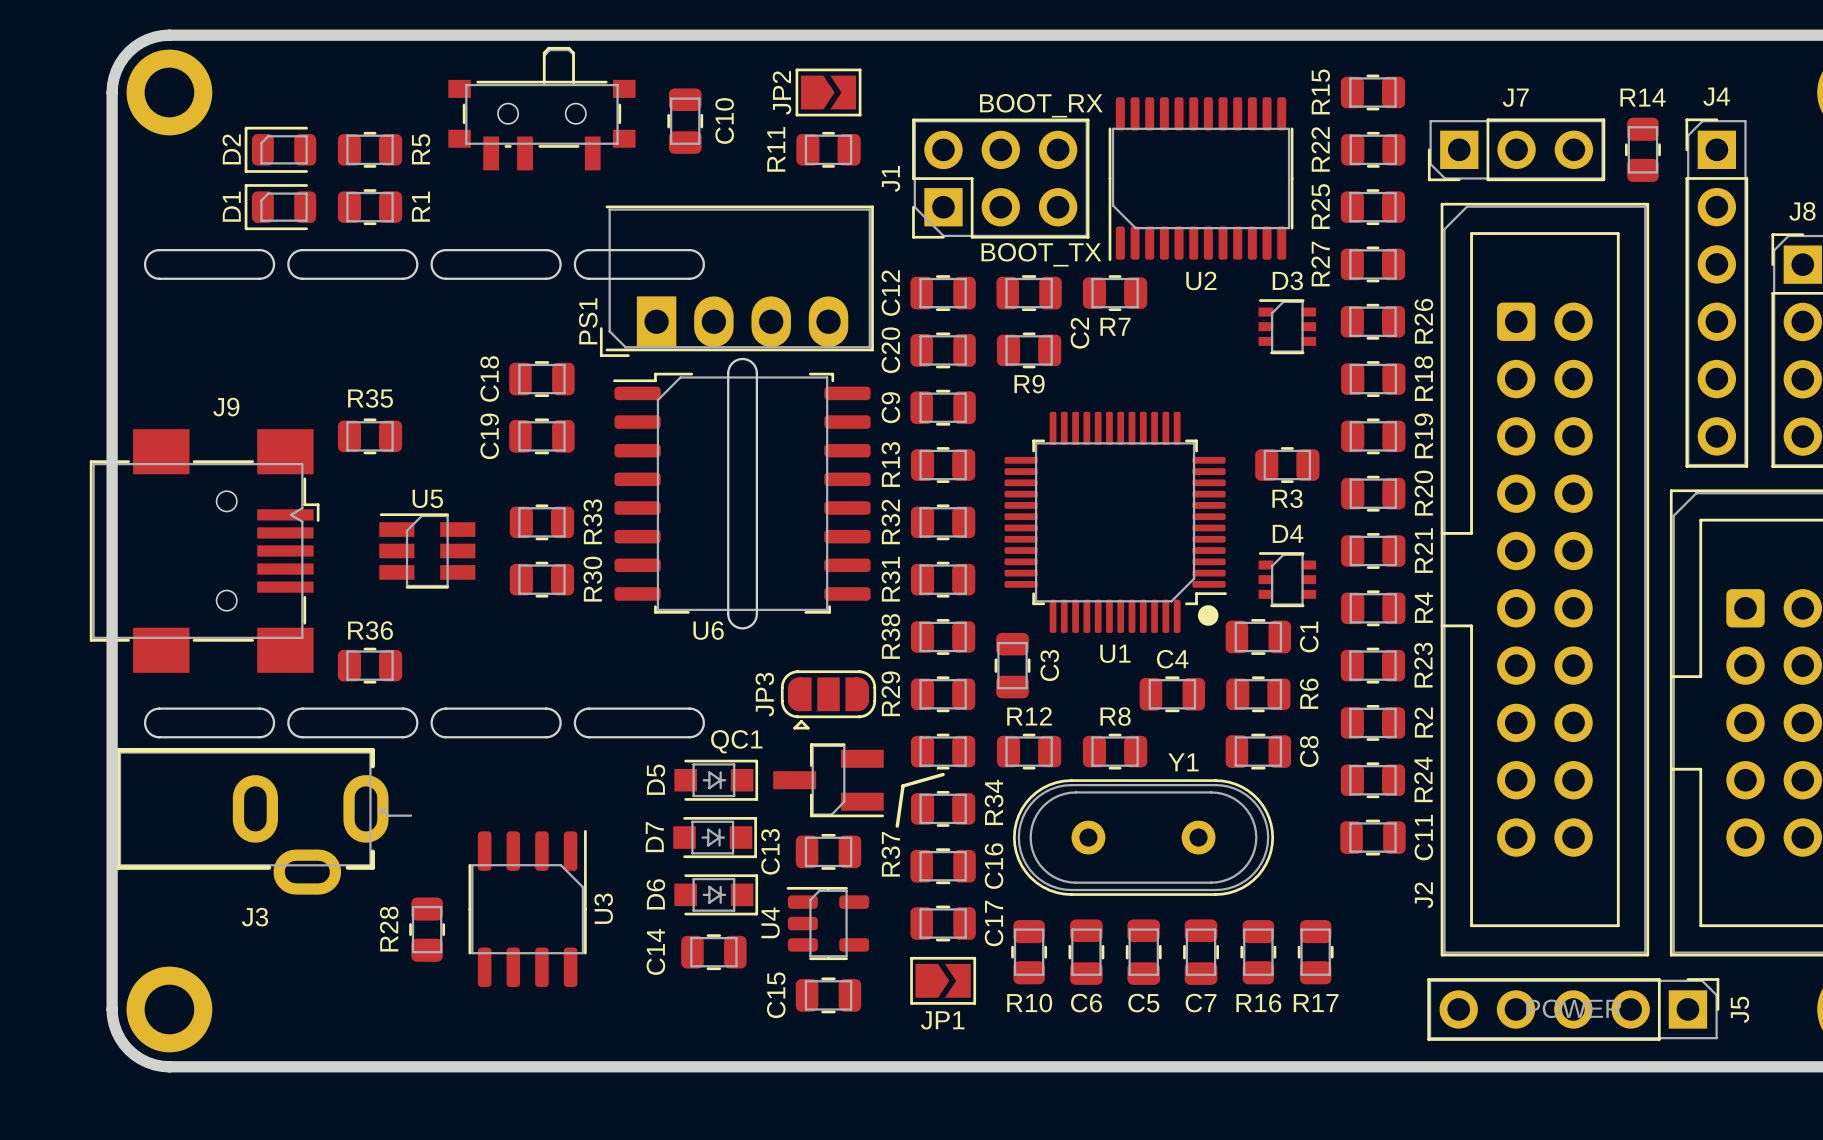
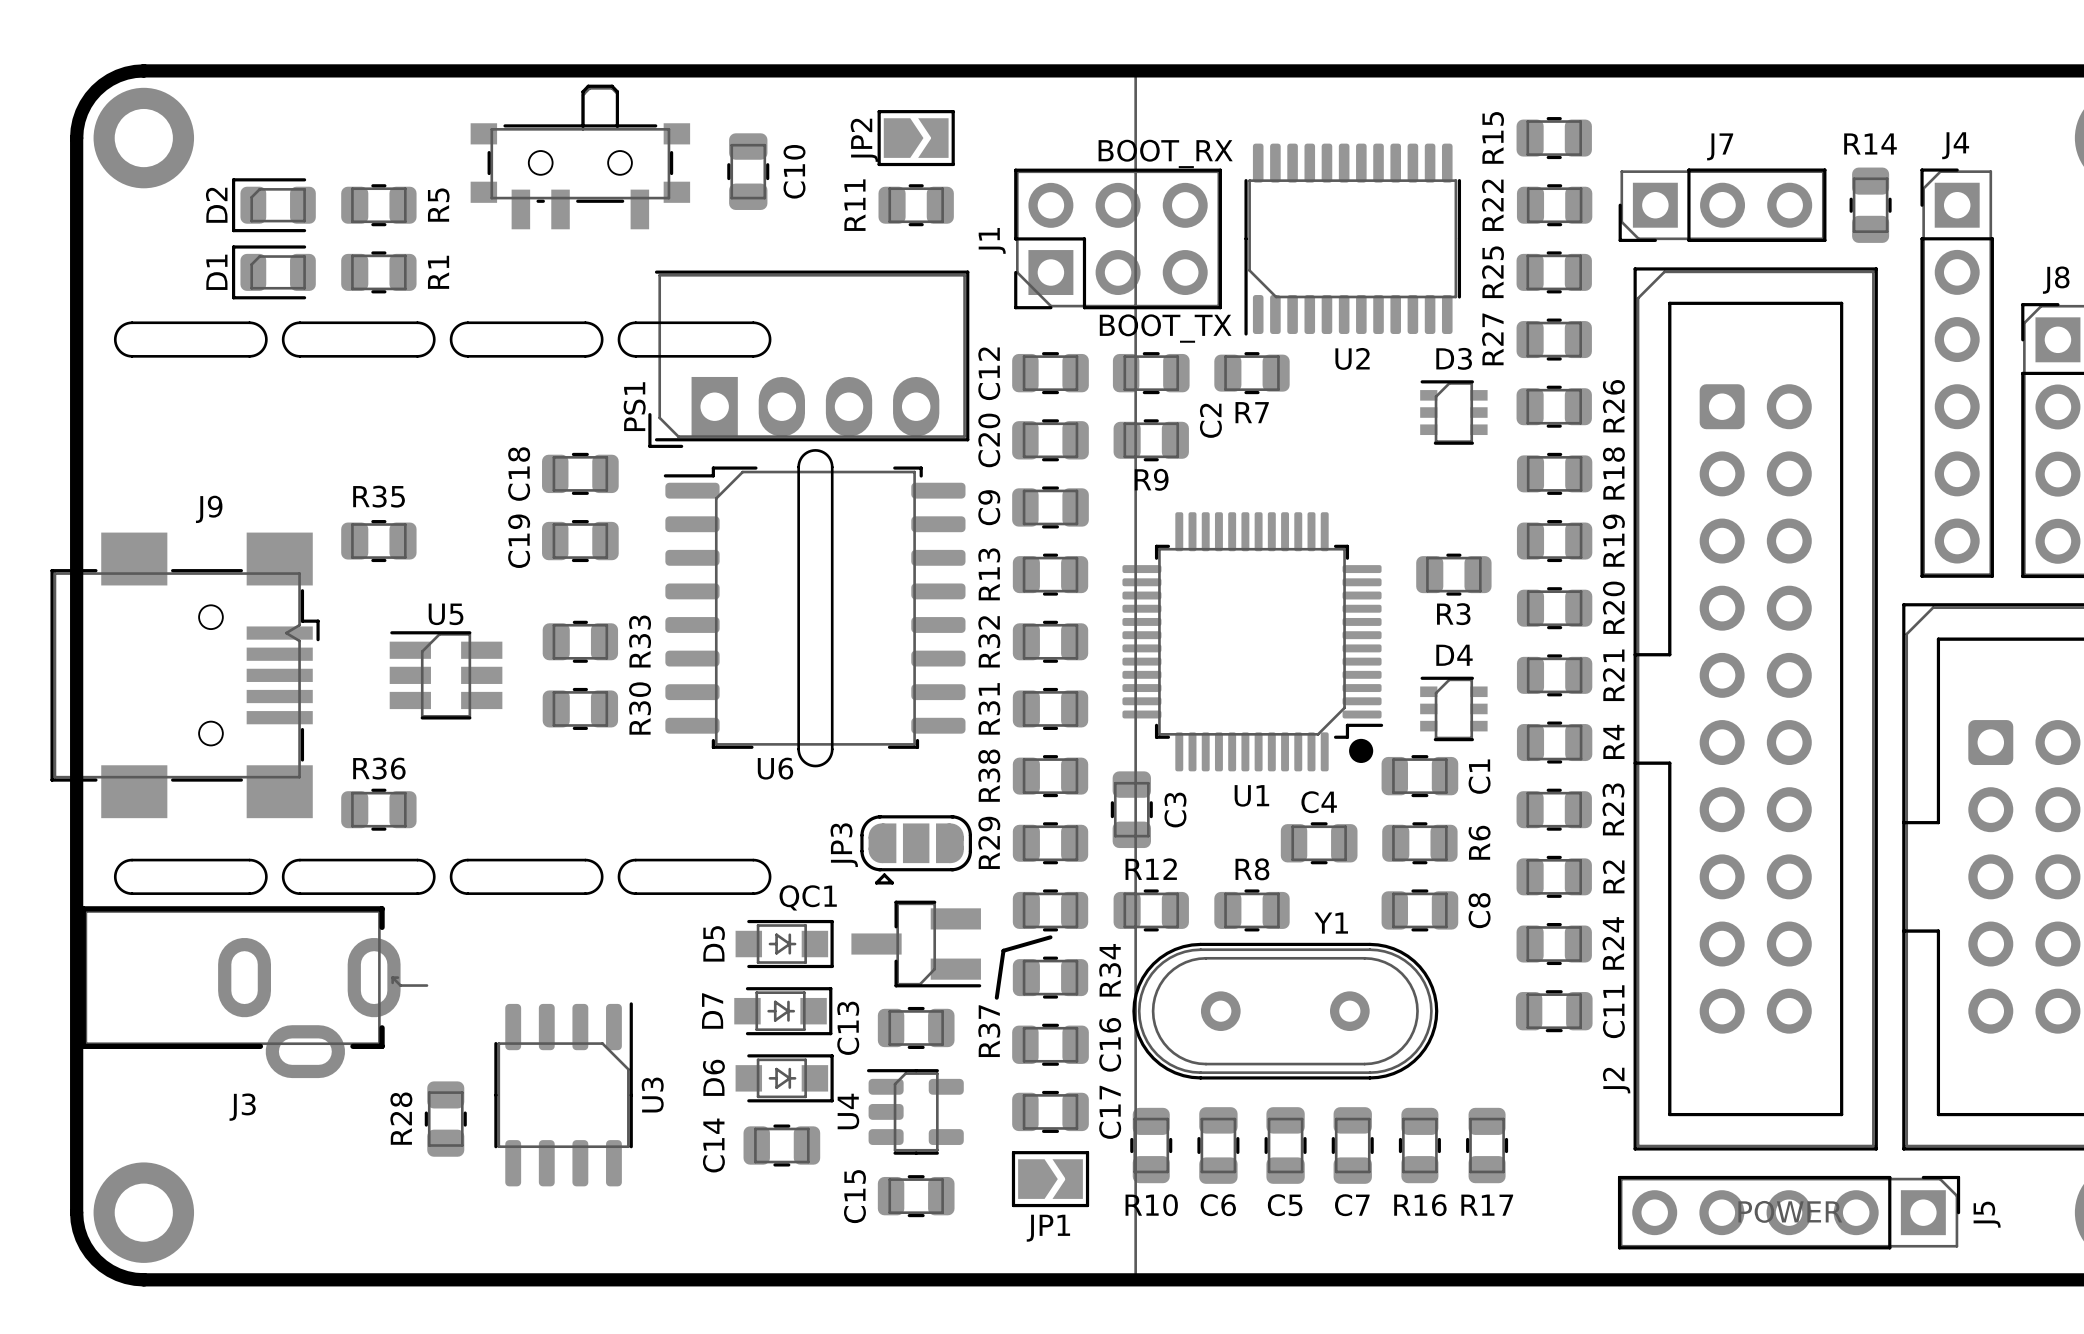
line: none -> (1135, 70) (1135, 1279)

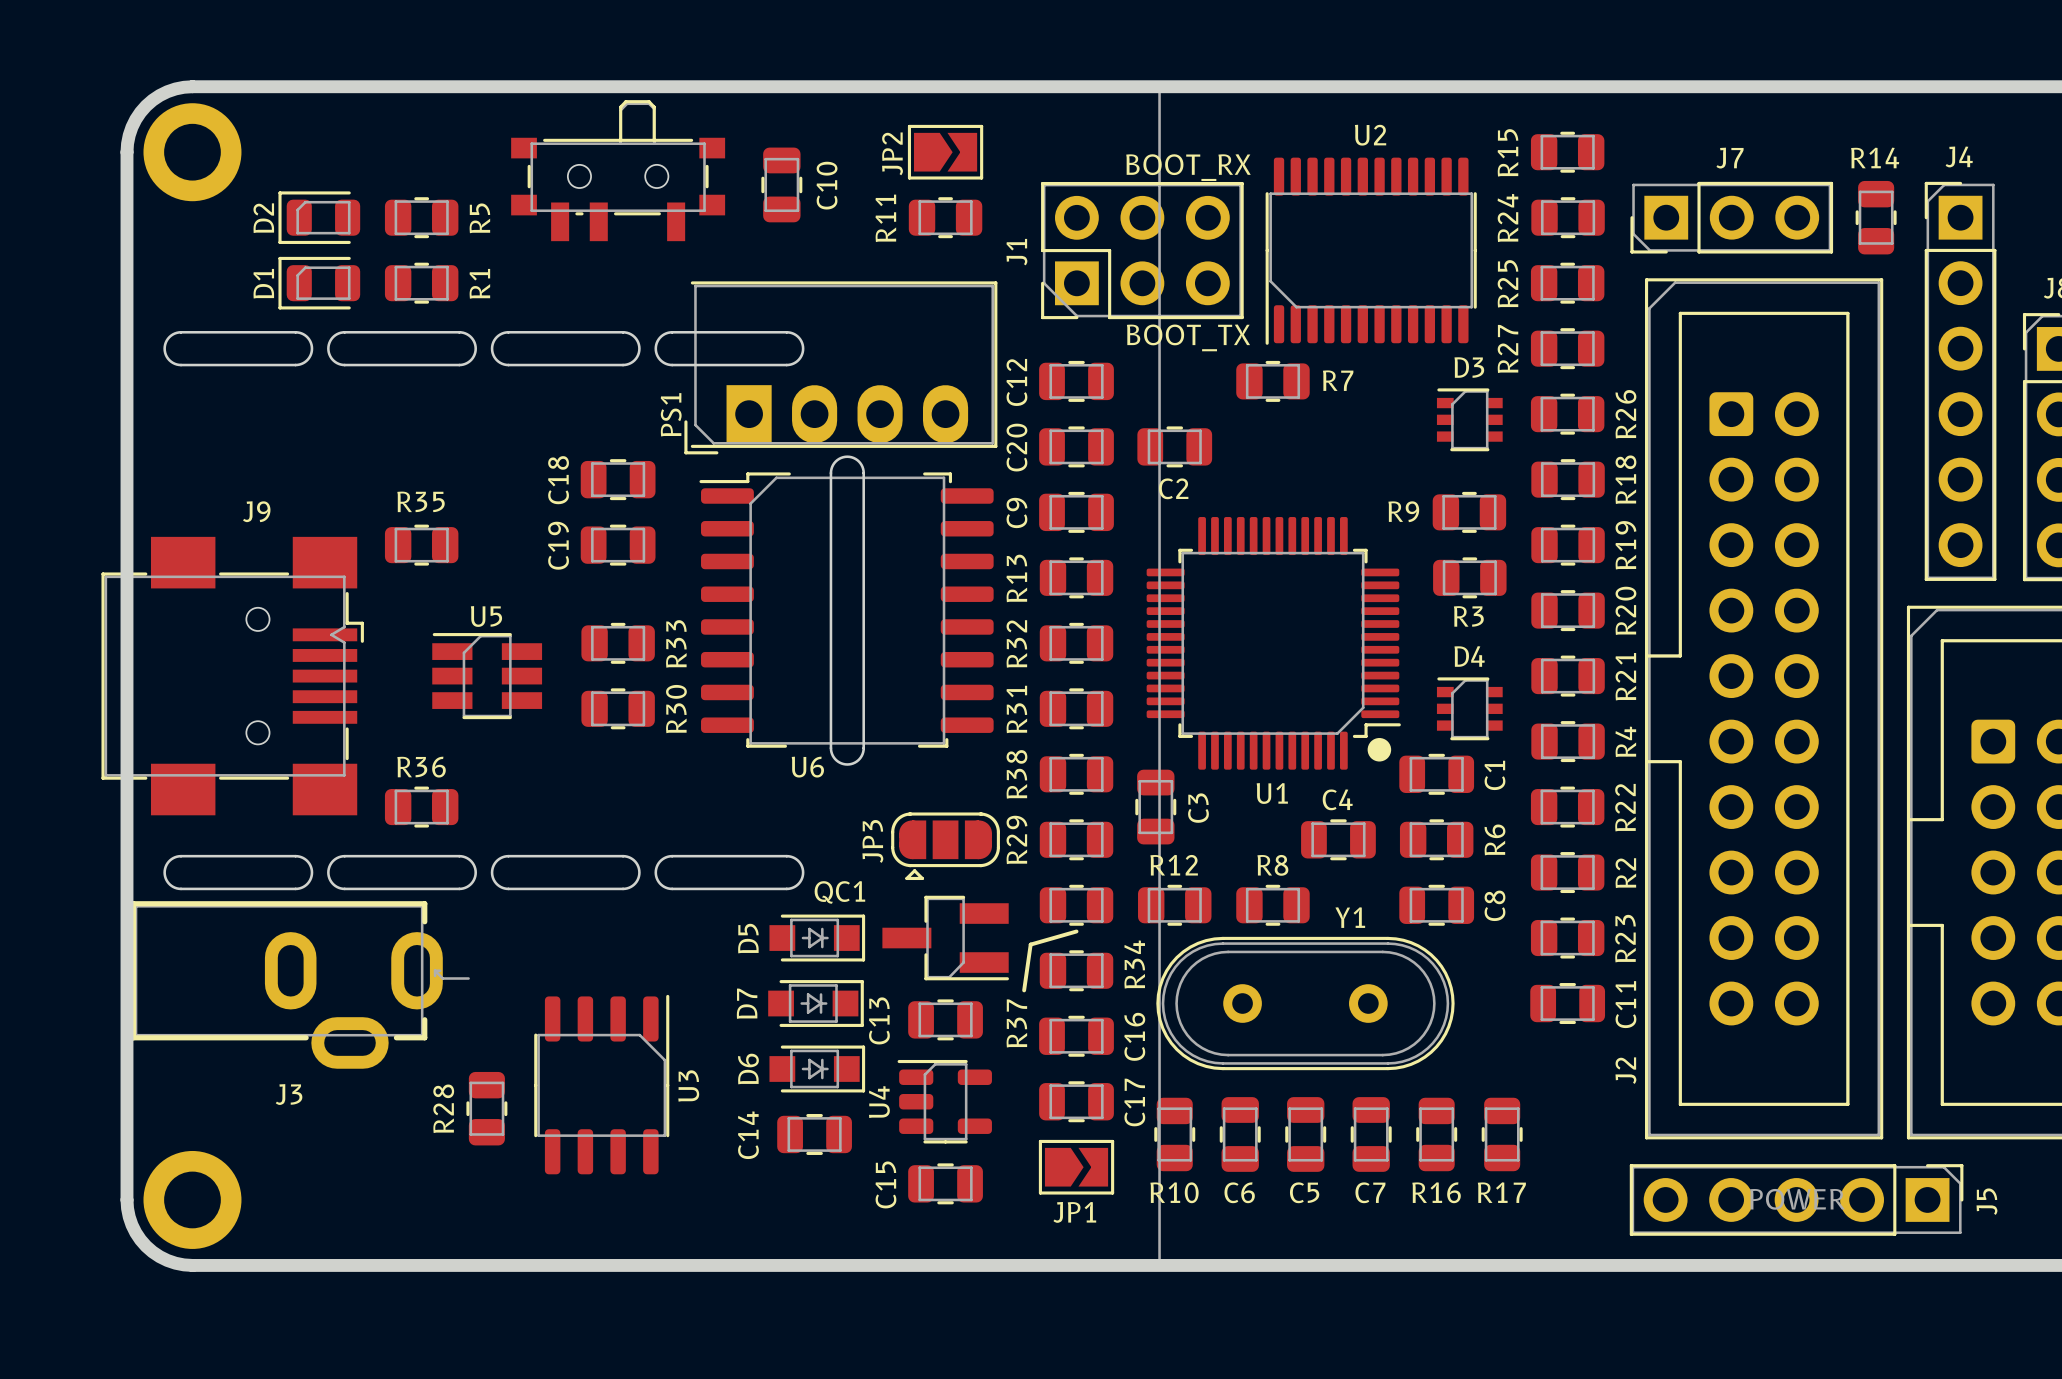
R22 name: R22 (1492, 205) -> R24 (1507, 218)
U2 name position: U2 (1352, 358) -> U2 (1370, 135)
C2 position: (1151, 373) -> (1174, 446)
R7 name position: R7 (1252, 412) -> R7 (1338, 380)
C2 name rotation: 0° (1210, 420) -> 90° clockwise (1173, 488)
C2 name position: C2 (1210, 420) -> C2 (1173, 488)
R9 position: (1151, 440) -> (1469, 512)
R9 name position: R9 (1151, 479) -> R9 (1403, 511)
R23 name: R23 (1613, 809) -> R22 (1625, 807)
R24 name: R24 (1613, 943) -> R23 (1625, 938)

